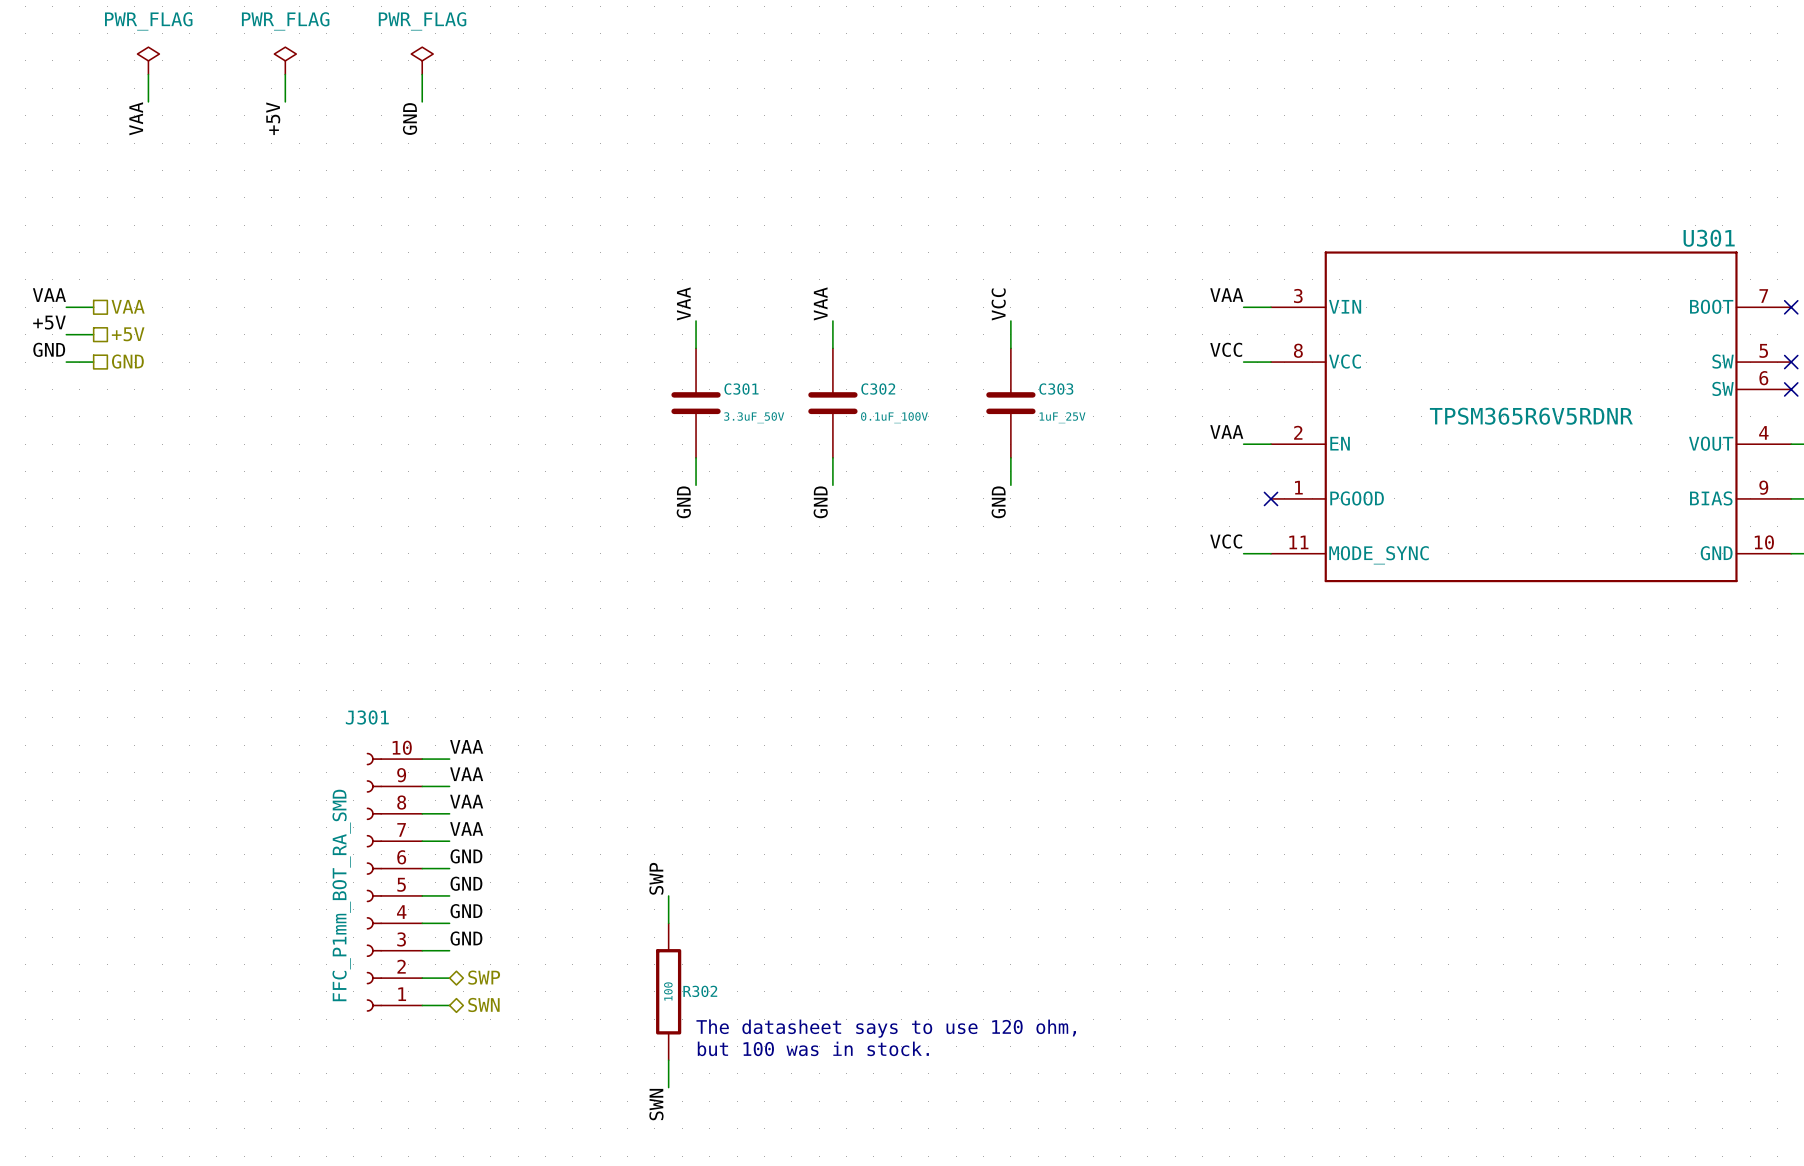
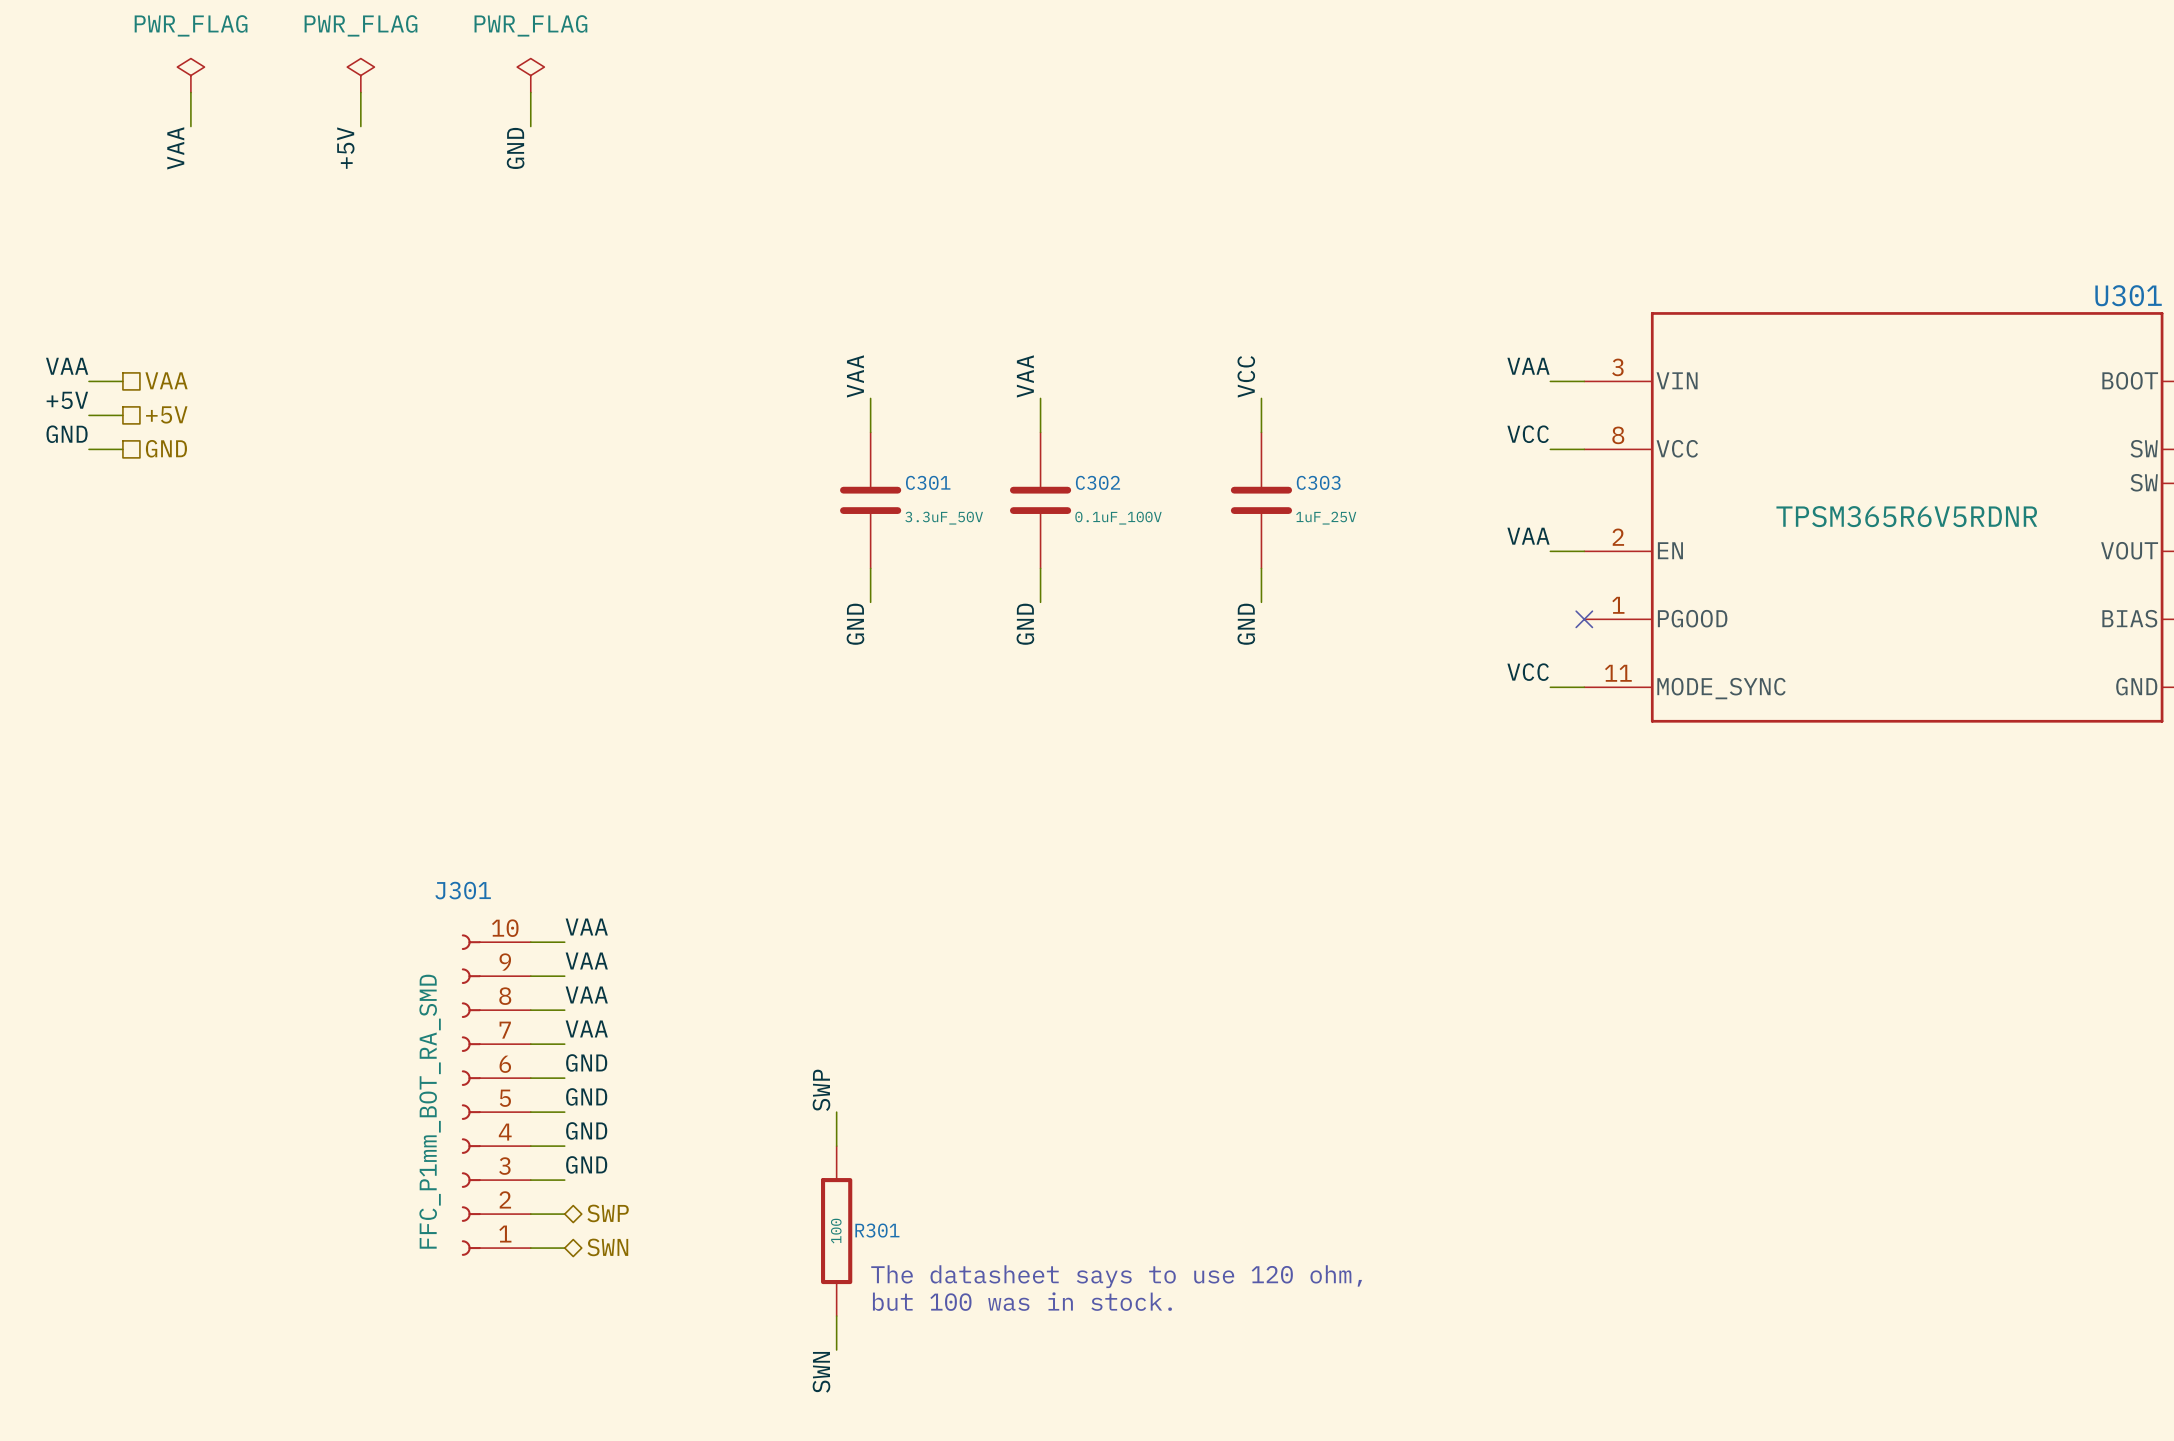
R302 name: R302 (700, 991) -> R301 (877, 1230)

